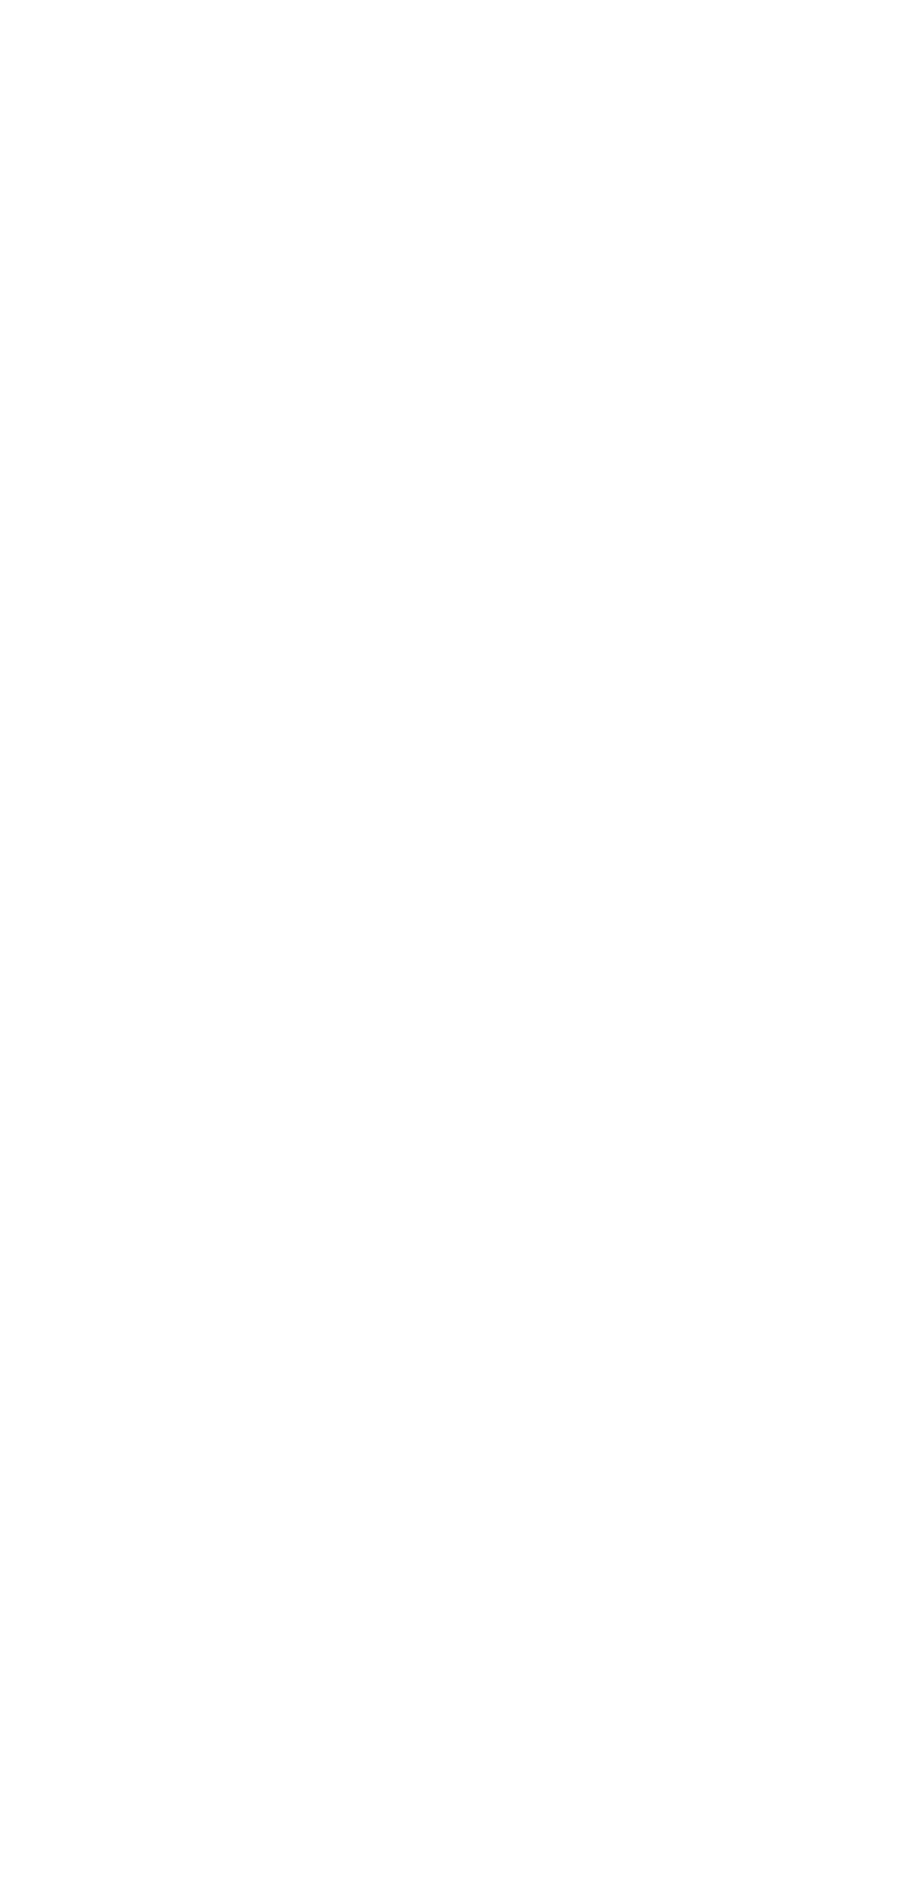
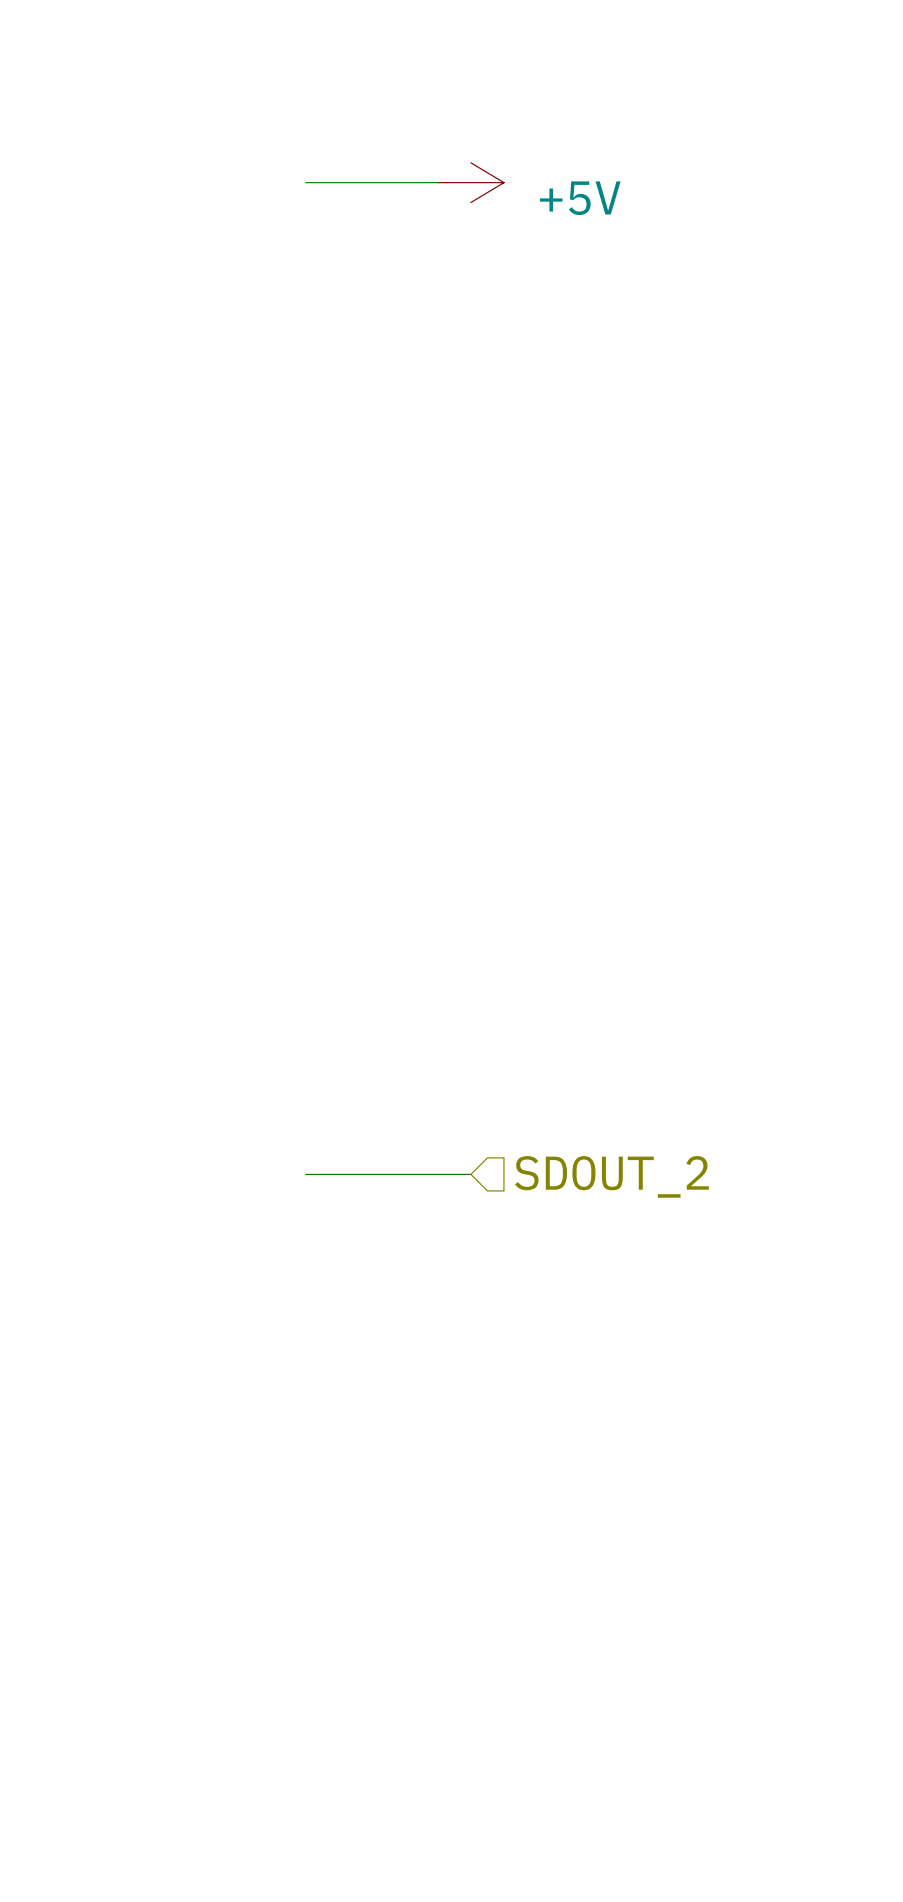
wire: none -> (305, 182) (437, 182)
power symbol: none -> +5V (470, 182)
wire: none -> (305, 1174) (470, 1174)
hierarchical label: none -> SDOUT_2 (611, 1176)

